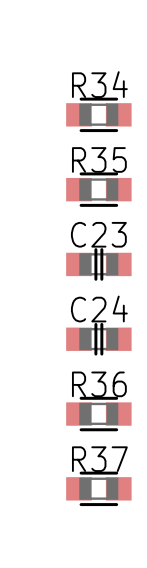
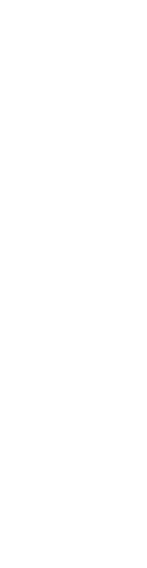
R34: (98, 114) -> none
R35: (98, 189) -> none
C23: (98, 264) -> none
C24: (98, 339) -> none
R36: (98, 414) -> none
R37: (98, 488) -> none

